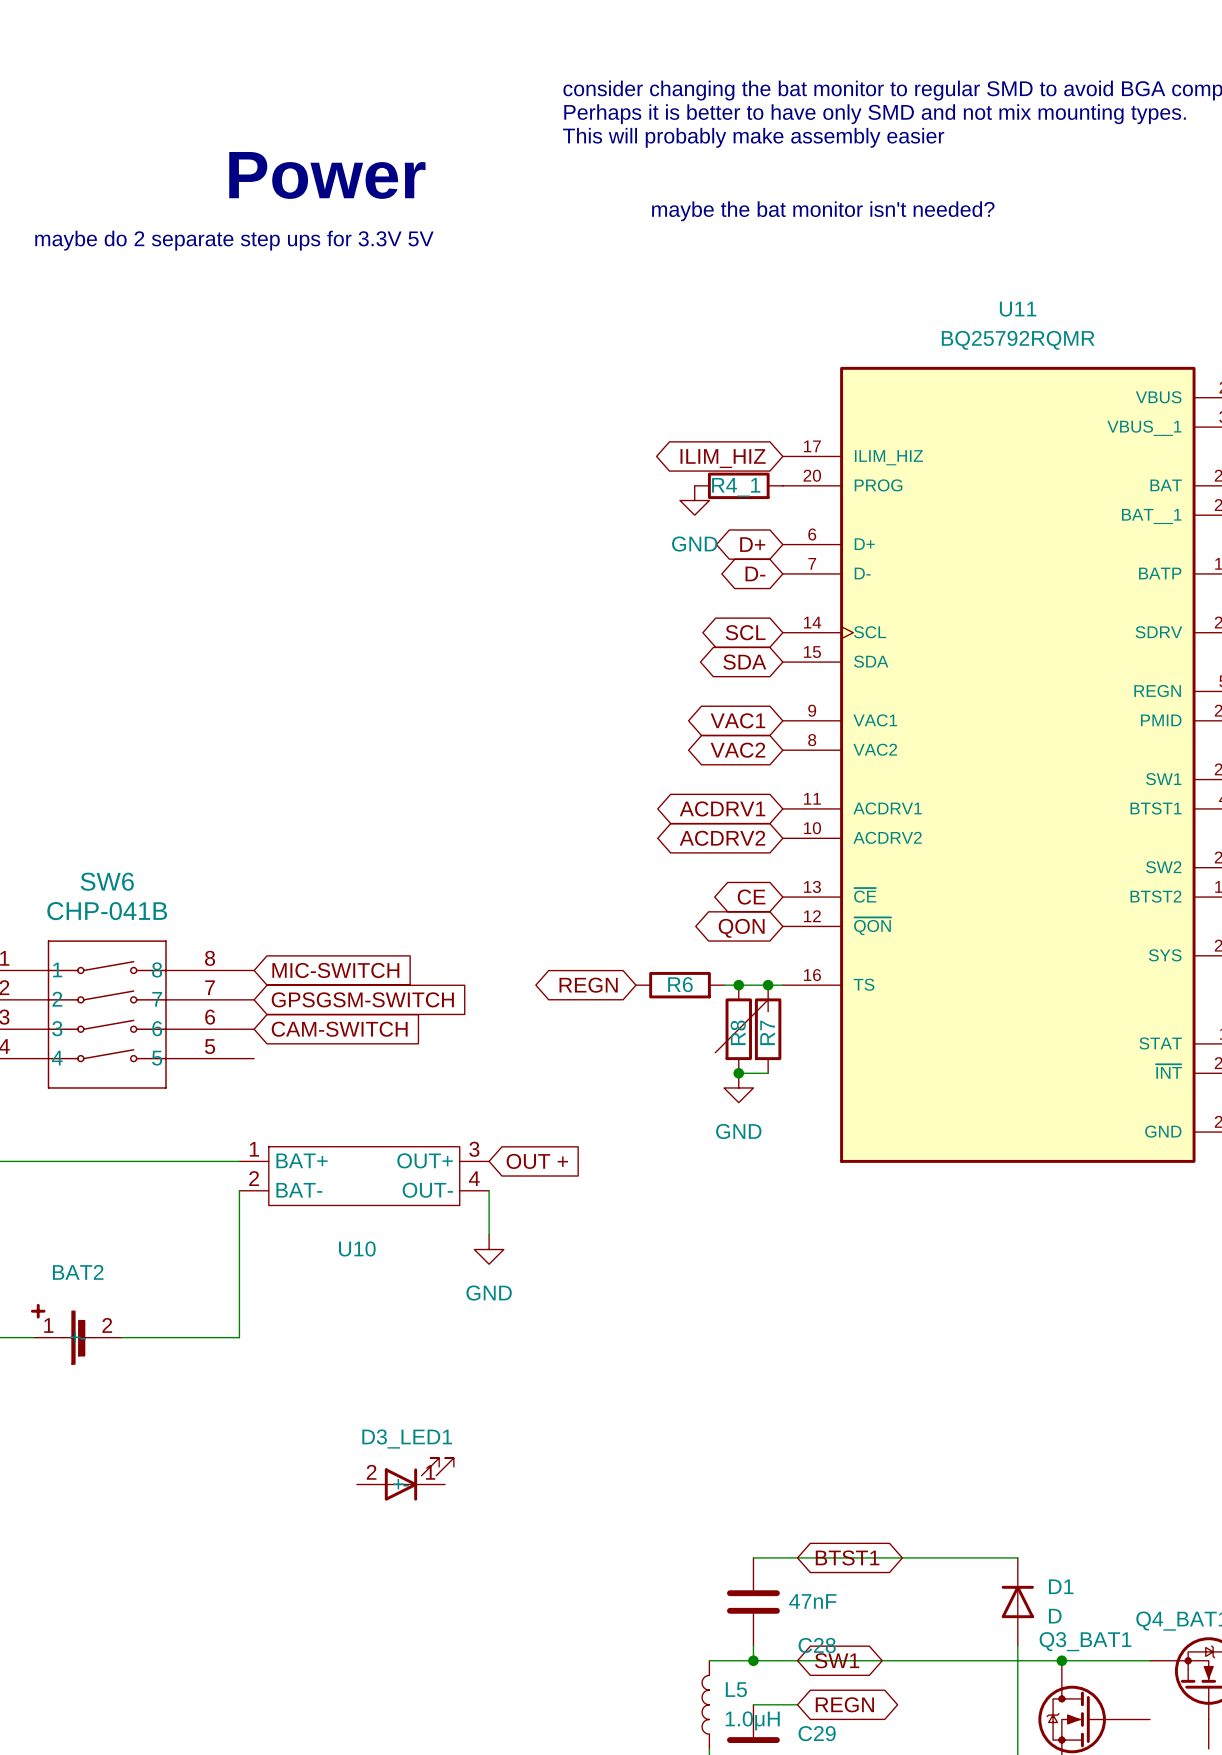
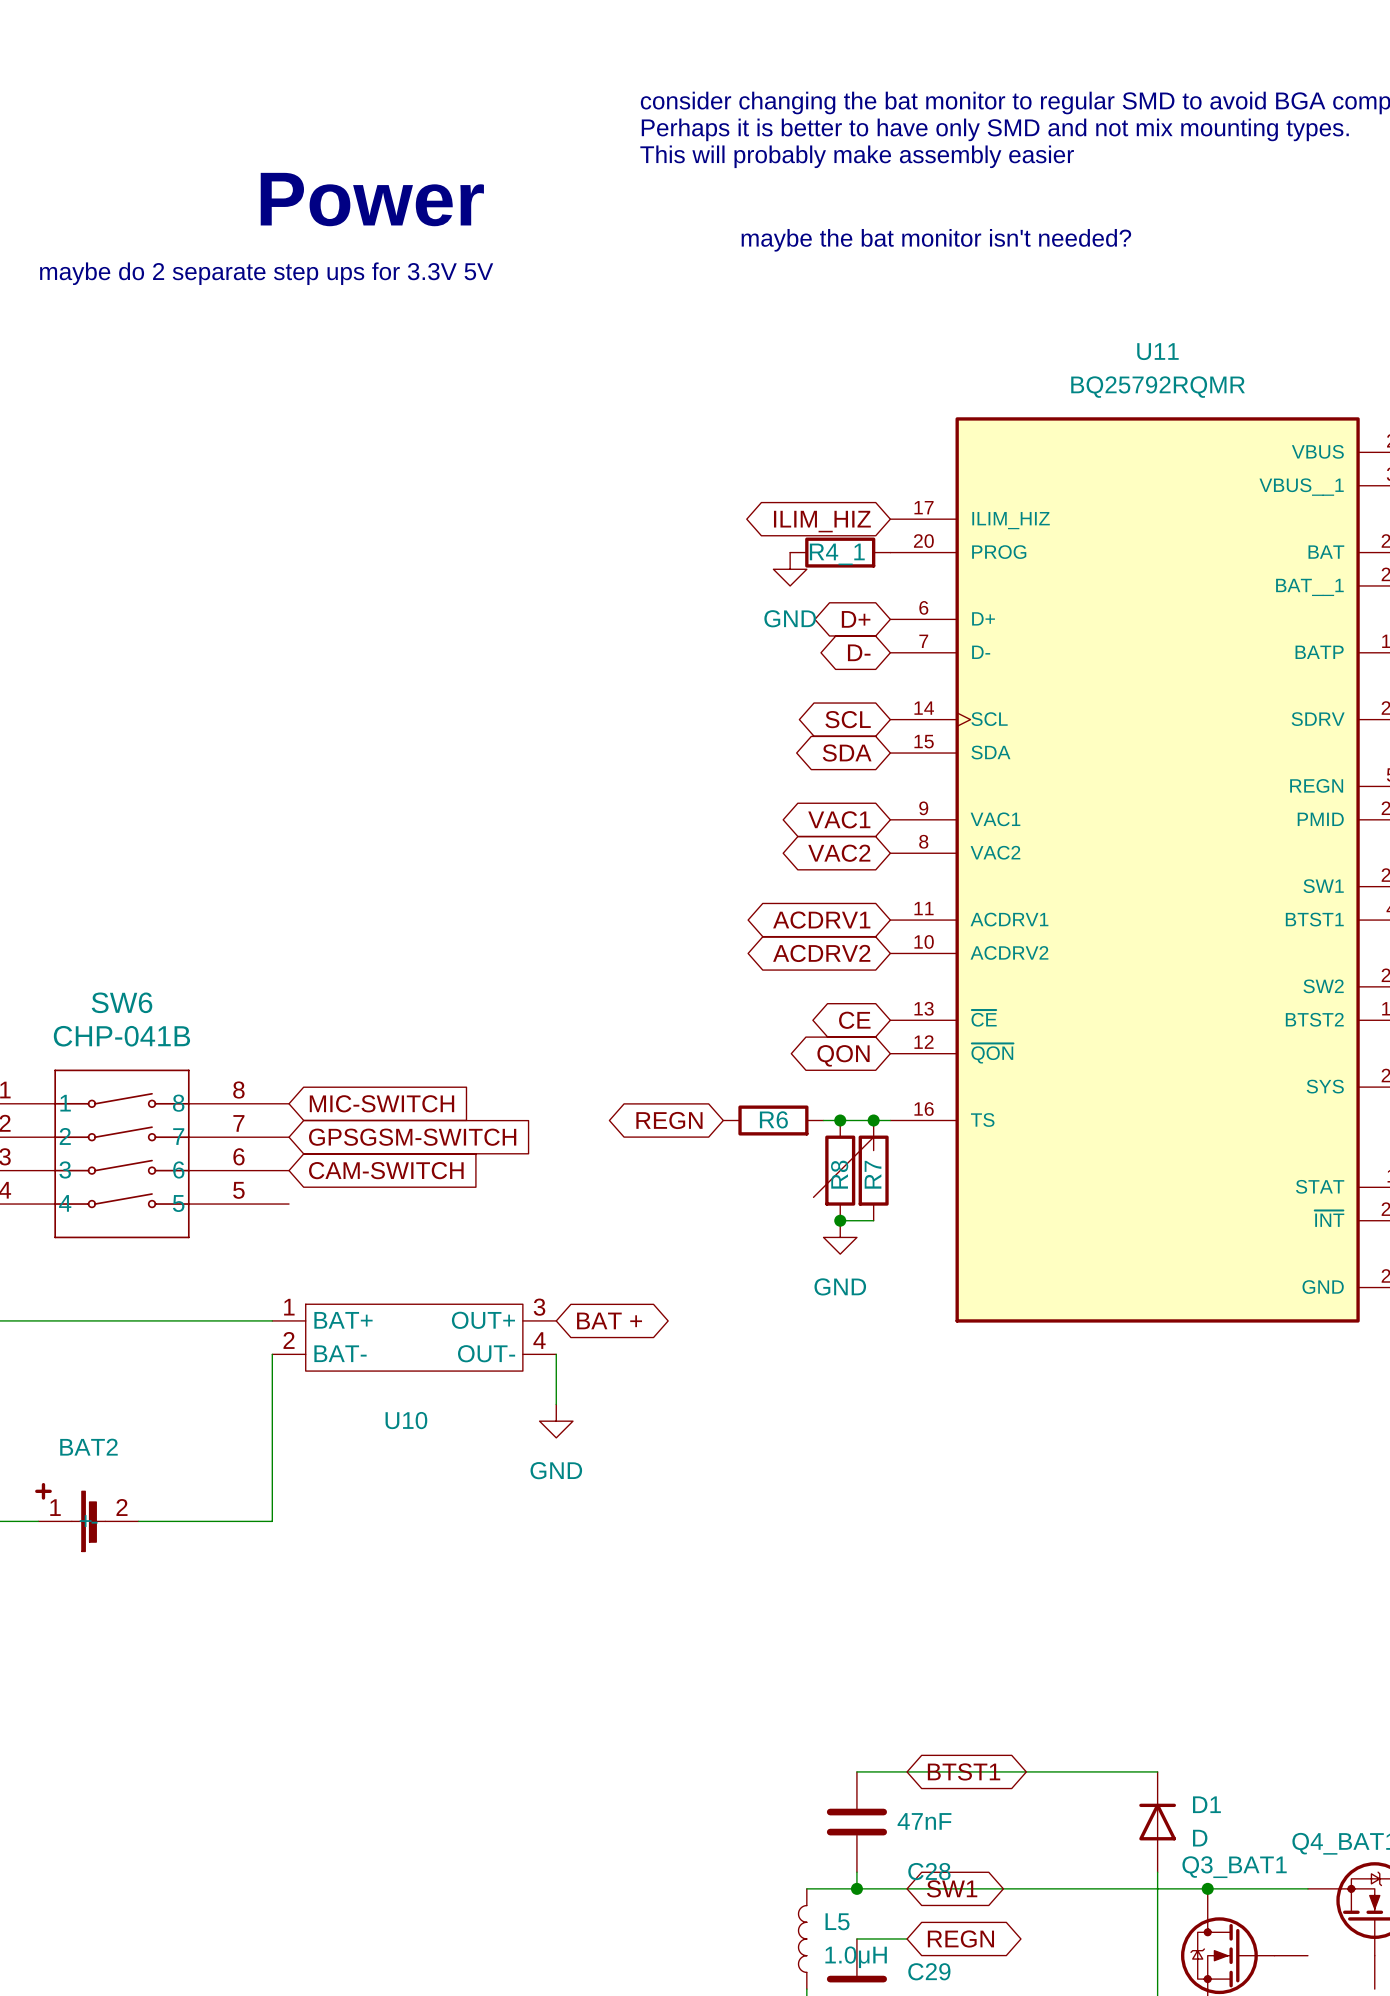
global label shape: input (537, 1161) -> bidirectional (609, 1320)
global label: OUT + (537, 1161) -> BAT + (609, 1320)
D3_LED1: (405, 1479) -> none

